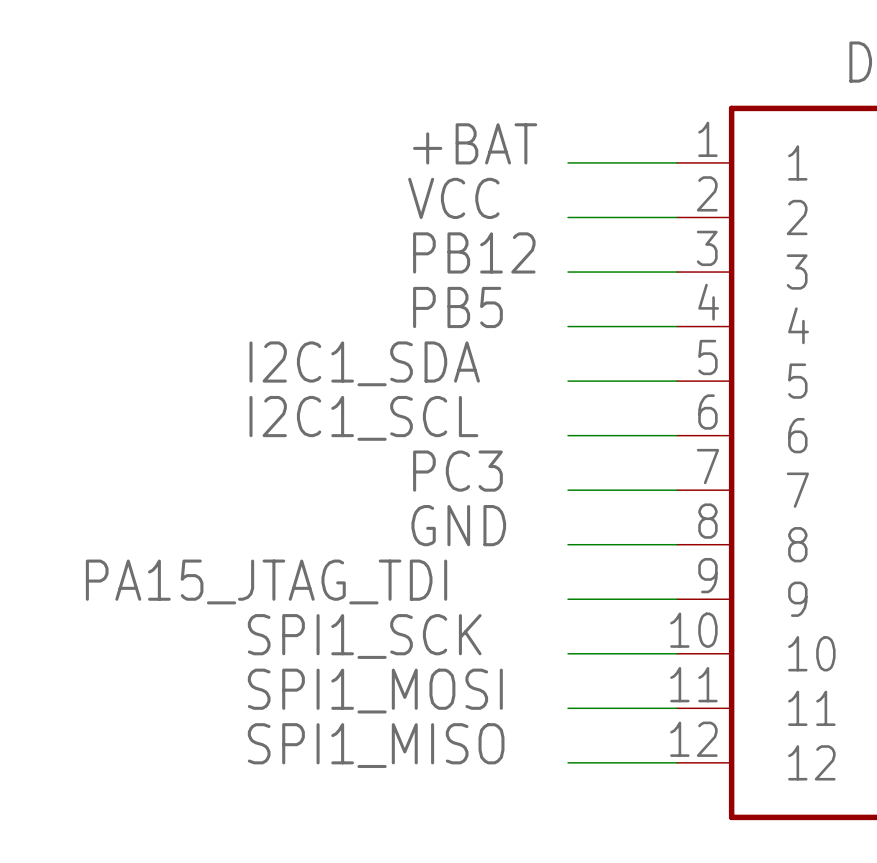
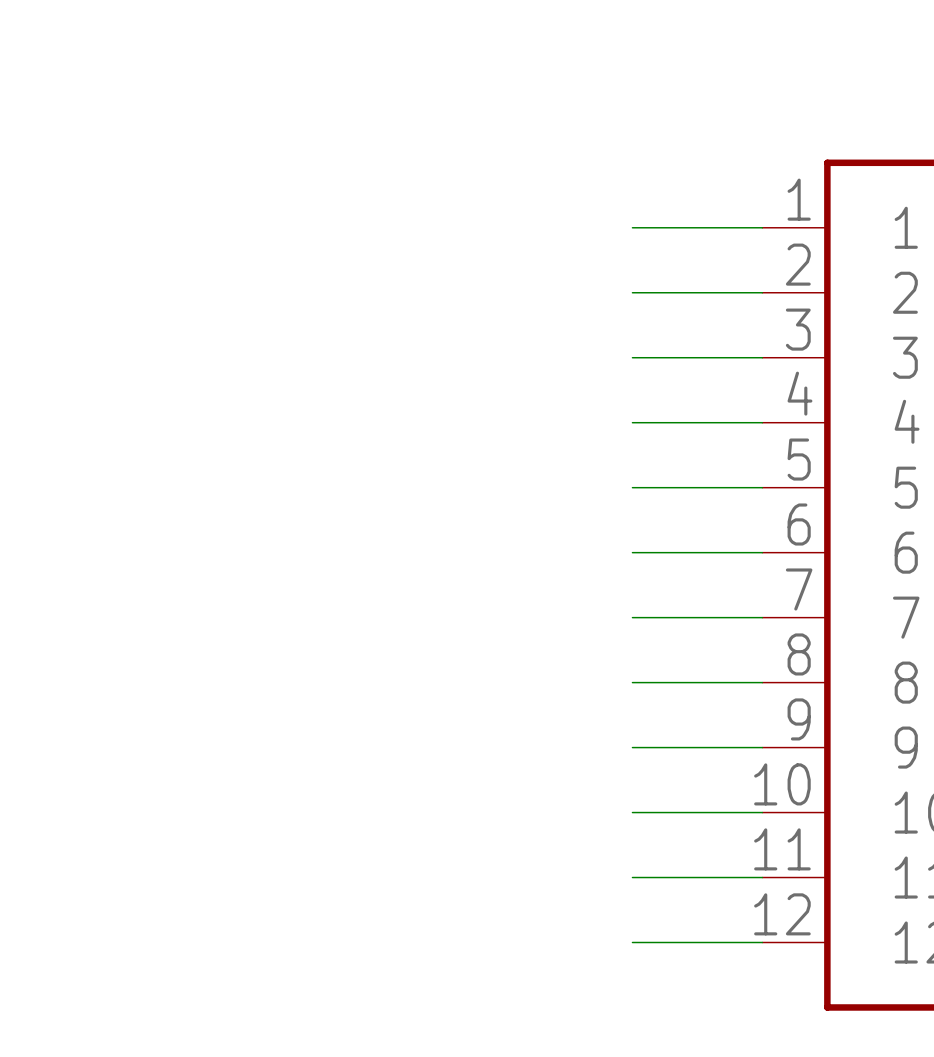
label: +BAT (475, 143) -> none
label: VCC (453, 198) -> none
label: PB12 (474, 252) -> none
label: PB5 (457, 307) -> none
label: I2C1_SDA (364, 363) -> none
label: I2C1_SCL (363, 418) -> none
label: PC3 (457, 471) -> none
label: GND (458, 525) -> none
label: PA15_JTAG_TDI (266, 581) -> none
label: SPI1_SCK (364, 636) -> none
label: SPI1_MOSI (375, 691) -> none
label: SPI1_MISO (376, 745) -> none

